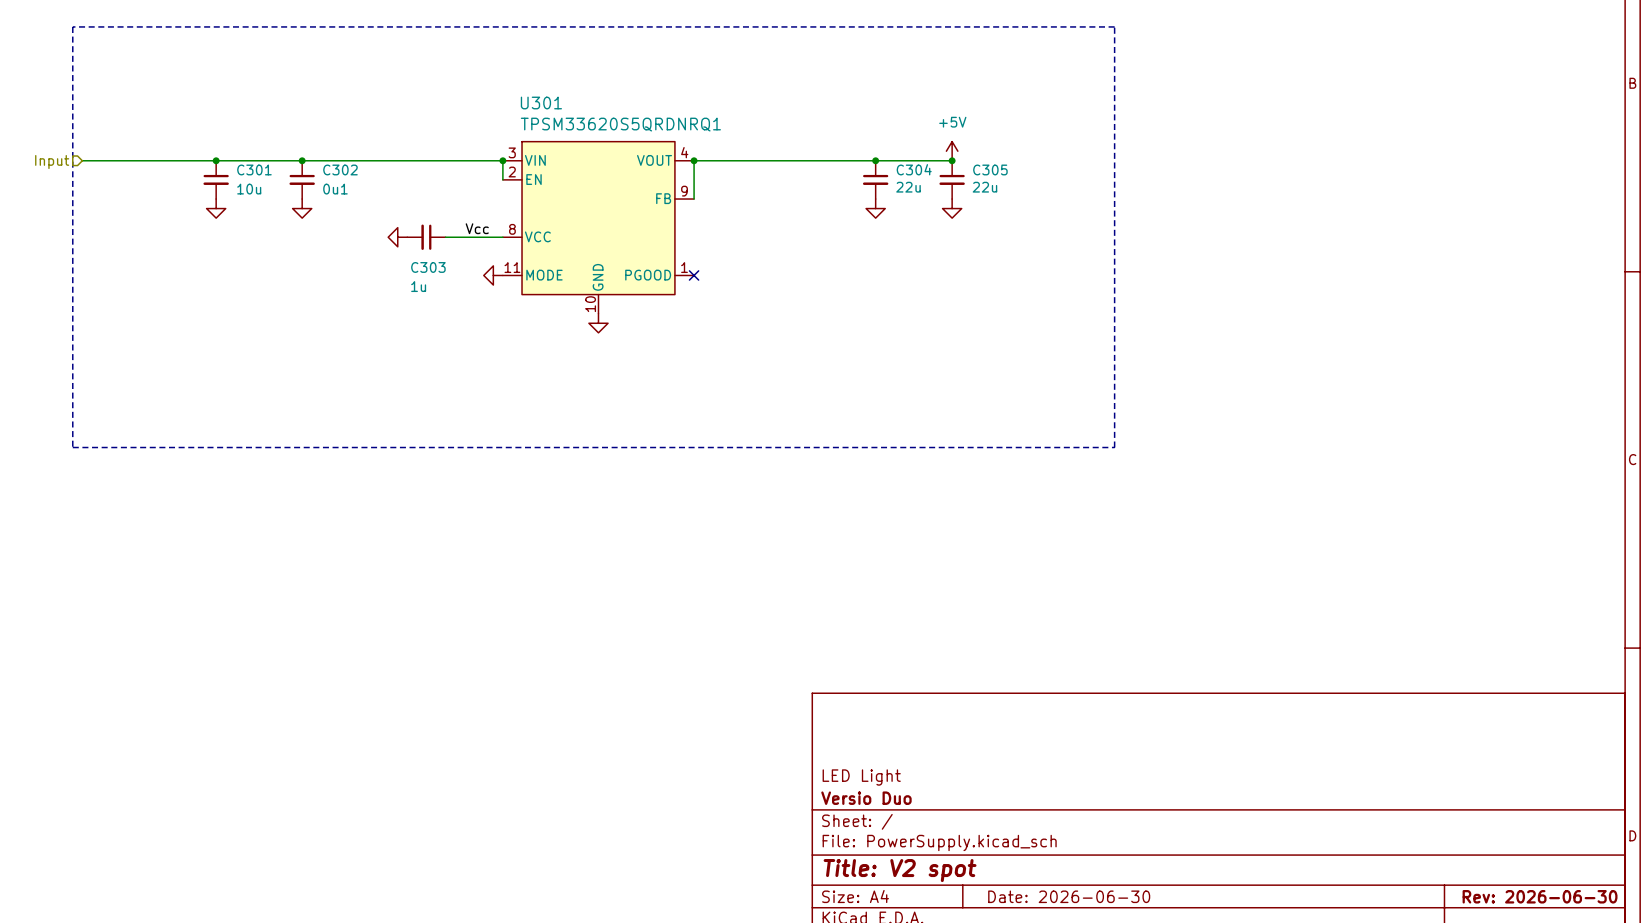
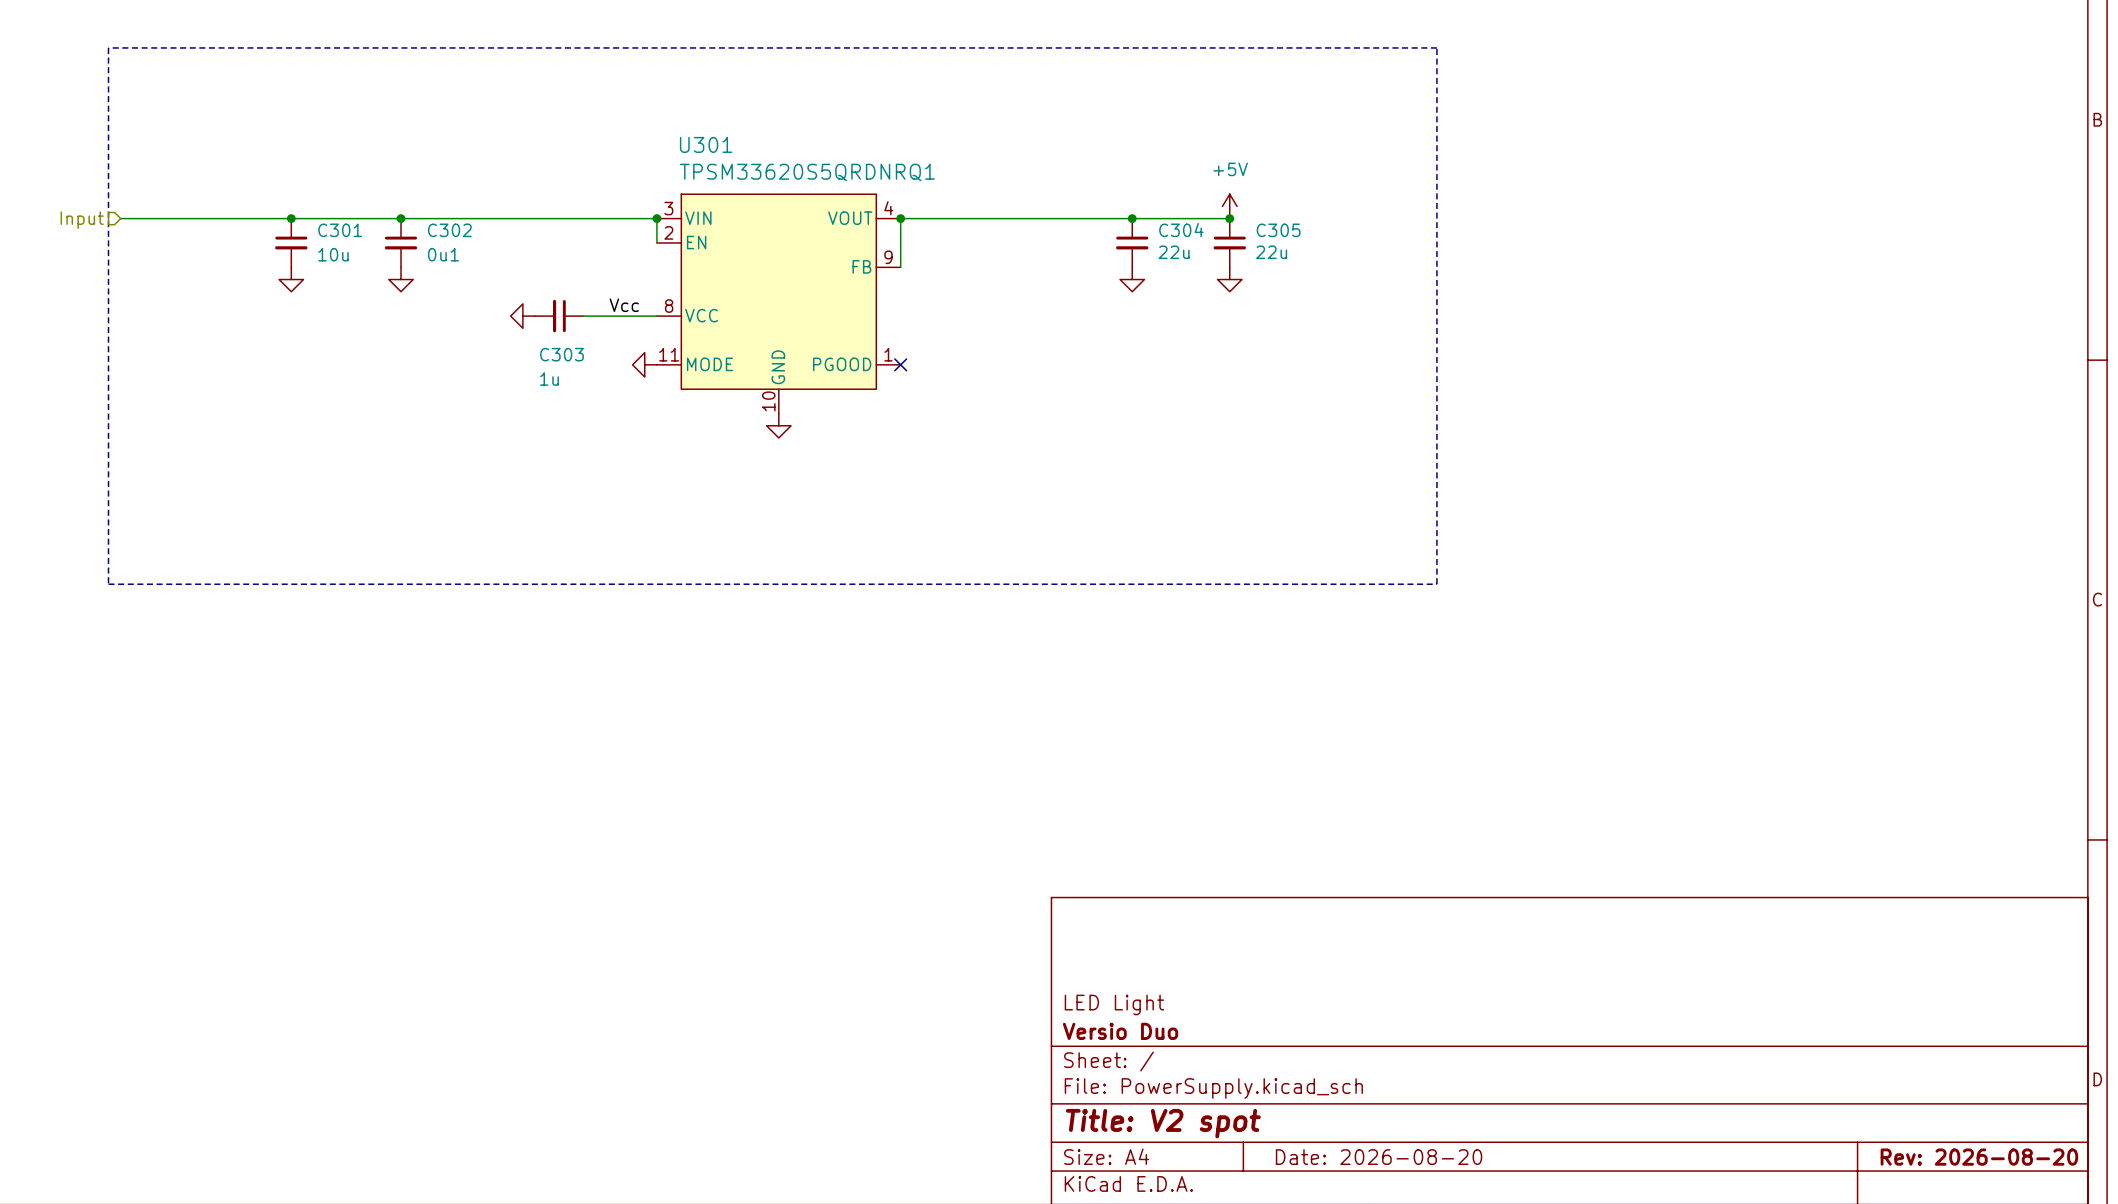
title block: Date: 2026-06-30 (1069, 896) -> Date: 2026-08-20 (1379, 1157)
title block: Rev: 2026-06-30 (1540, 896) -> Rev: 2026-08-20 (1979, 1157)

